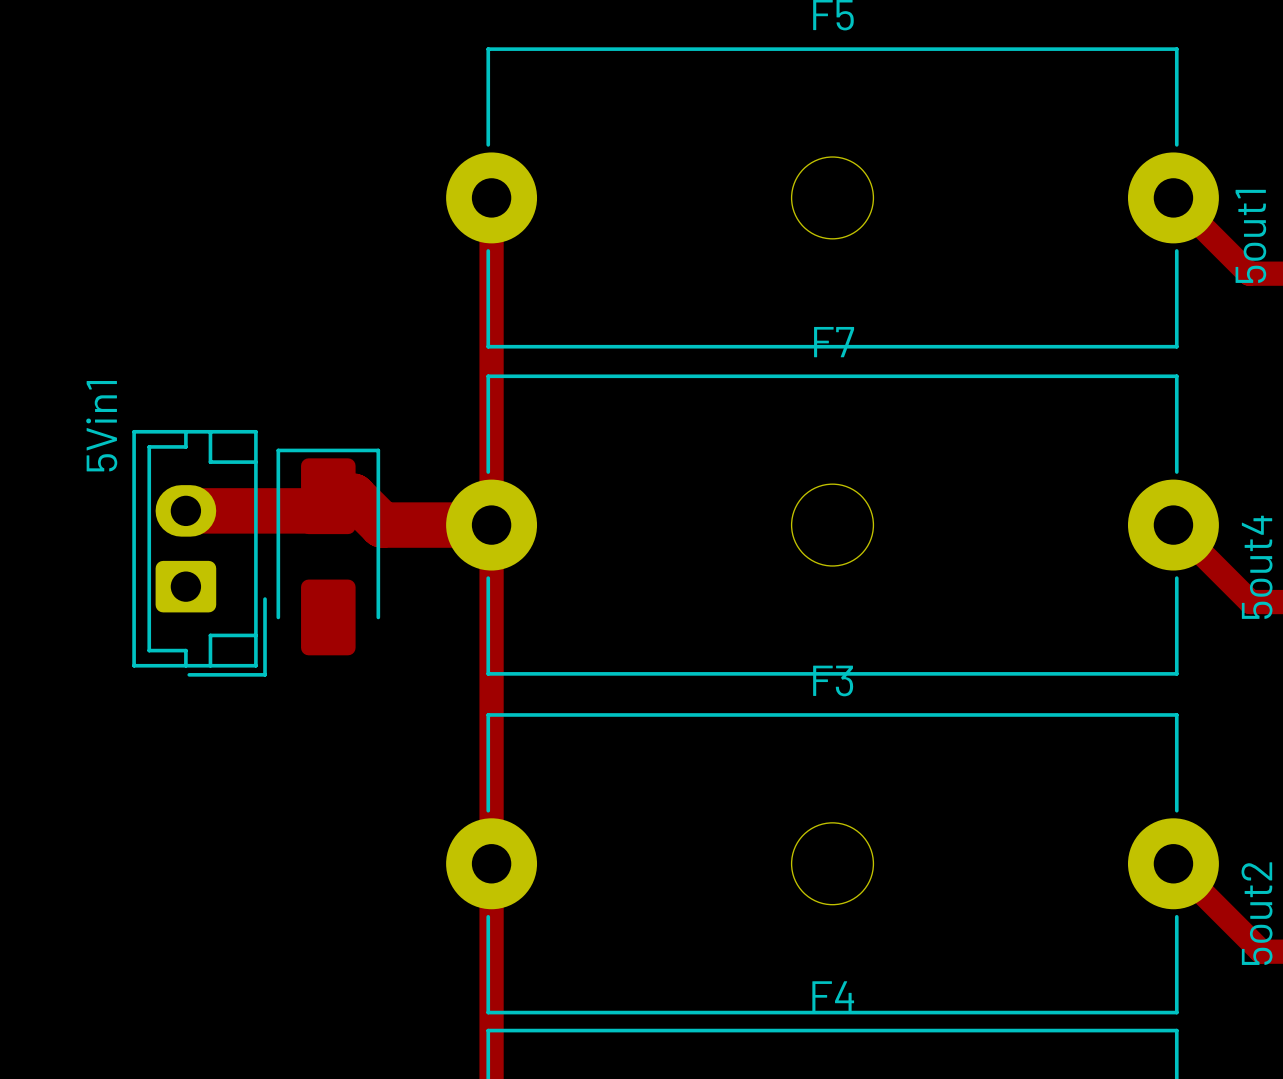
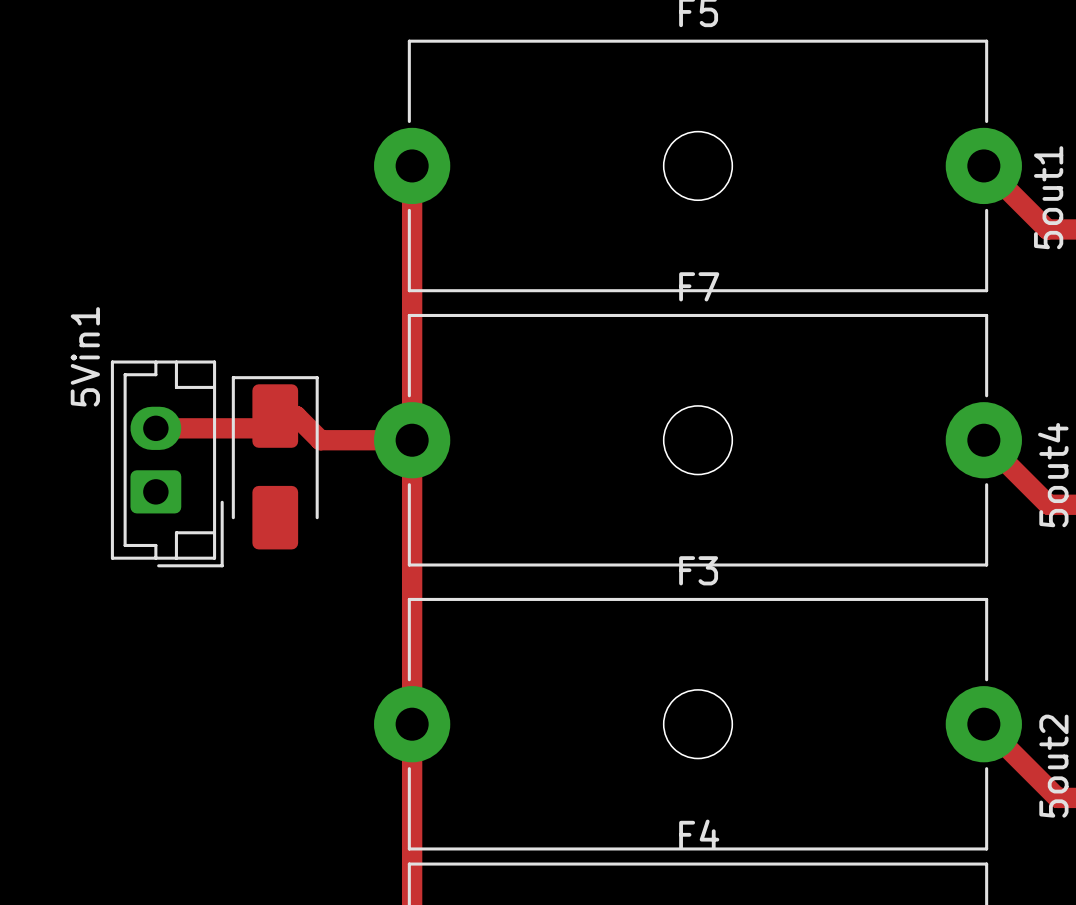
track width: thick (328, 496) (353, 496) (382, 525) (491, 525) -> thin (275, 416) (296, 416) (320, 440) (412, 440)
track width: thick (185, 510) (313, 510) -> thin (155, 428) (262, 428)

